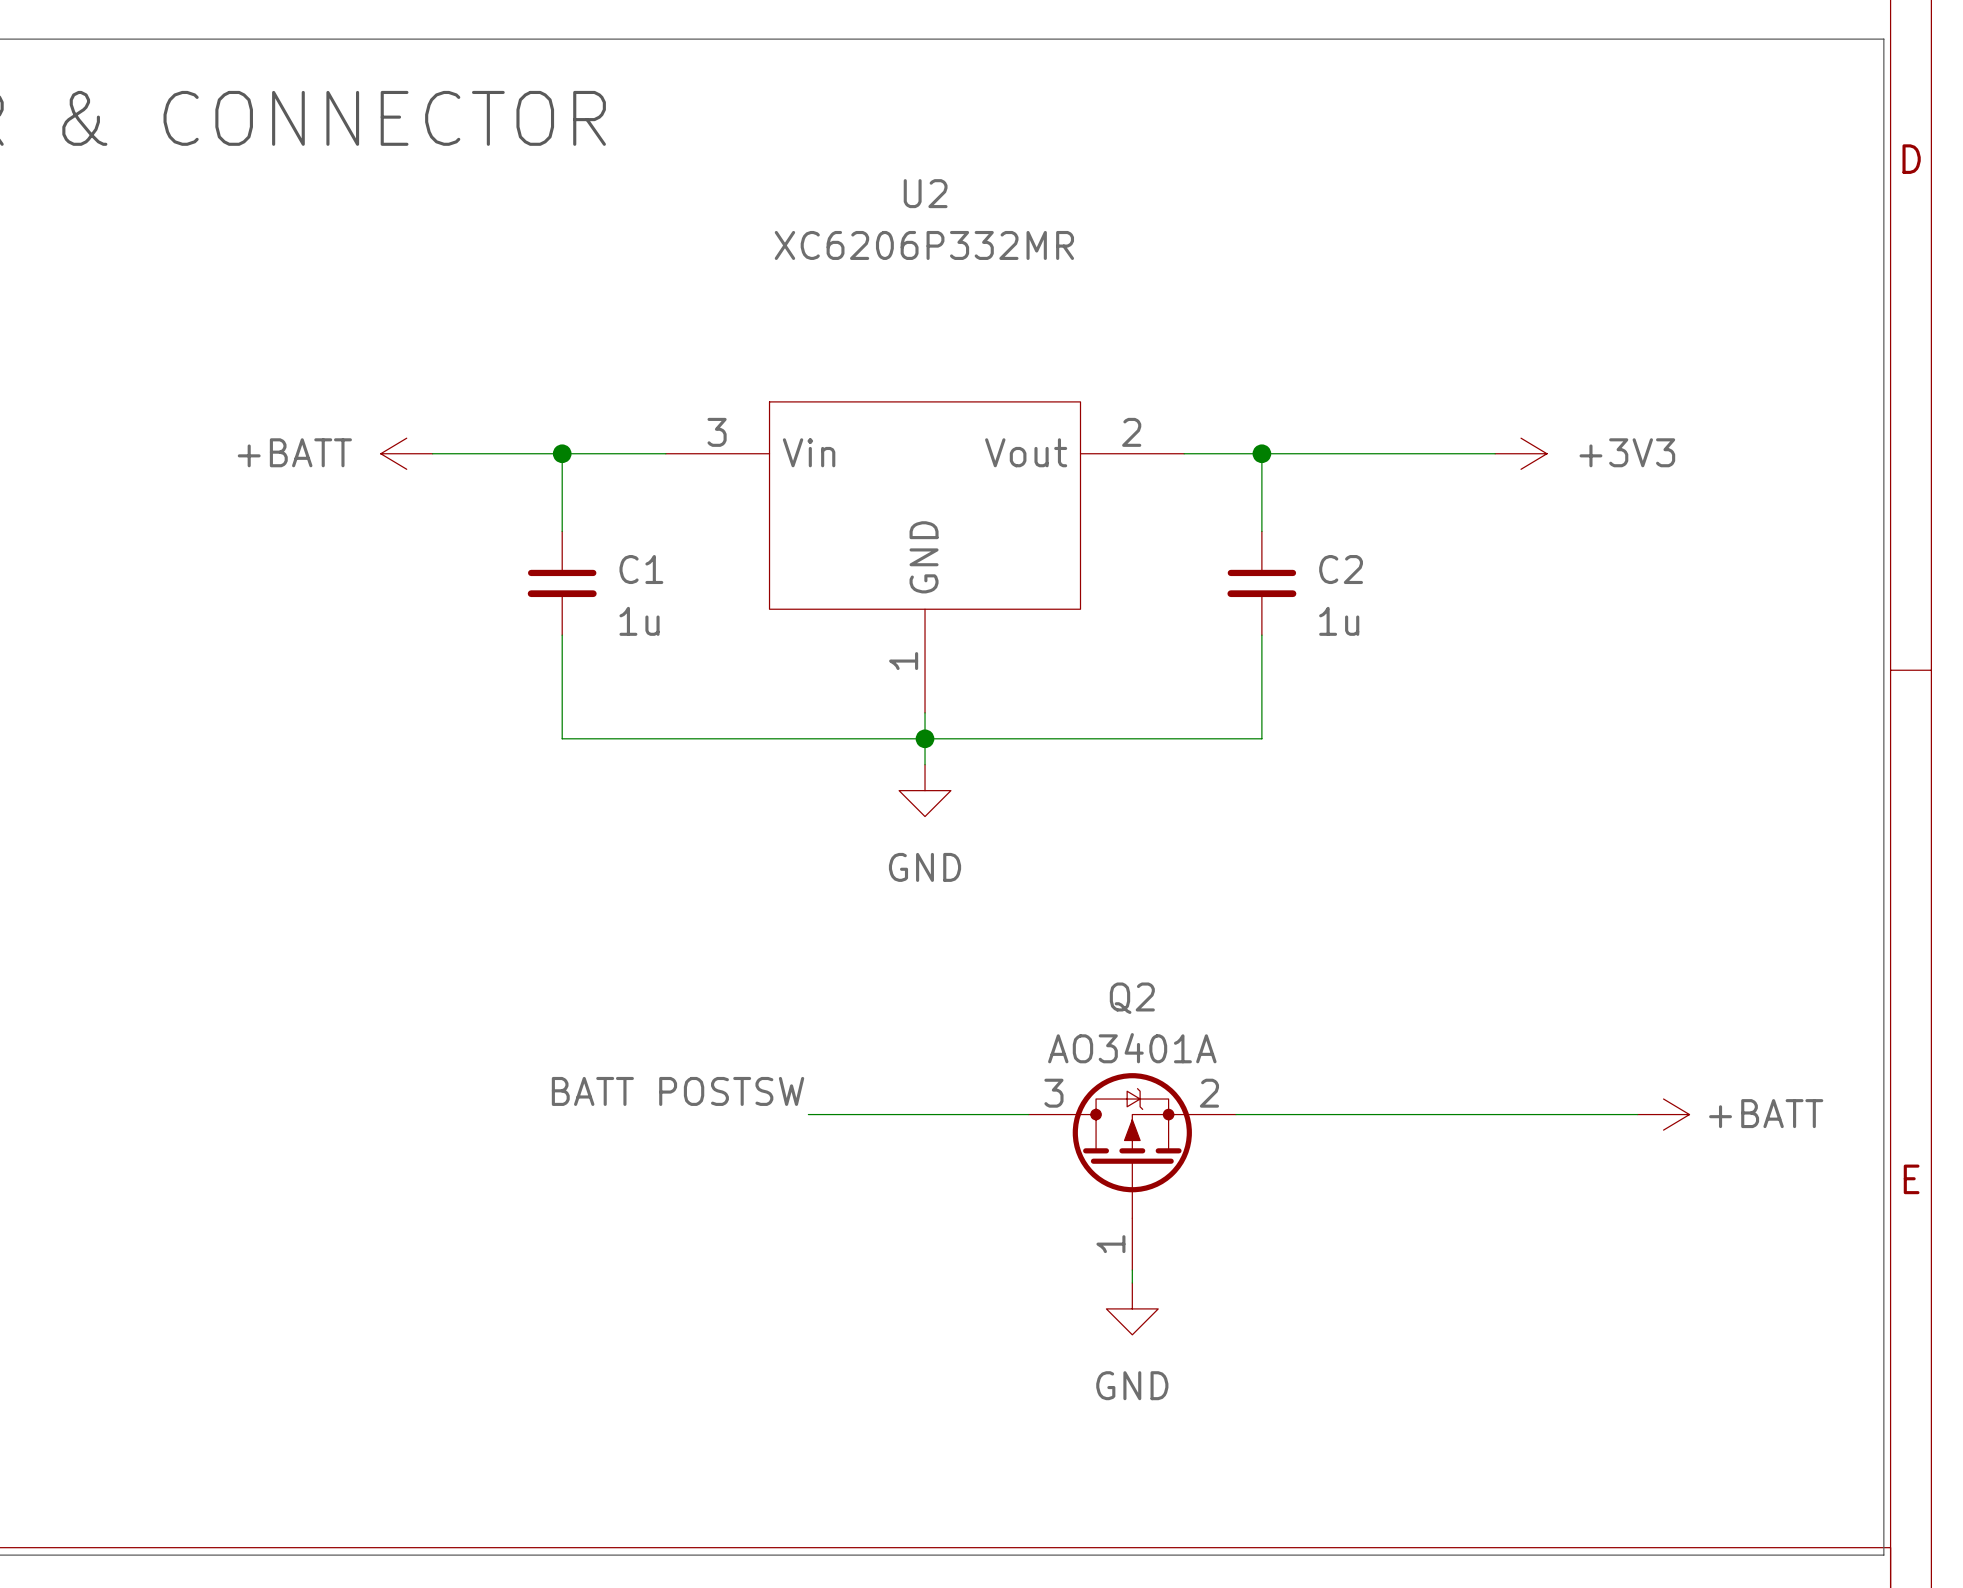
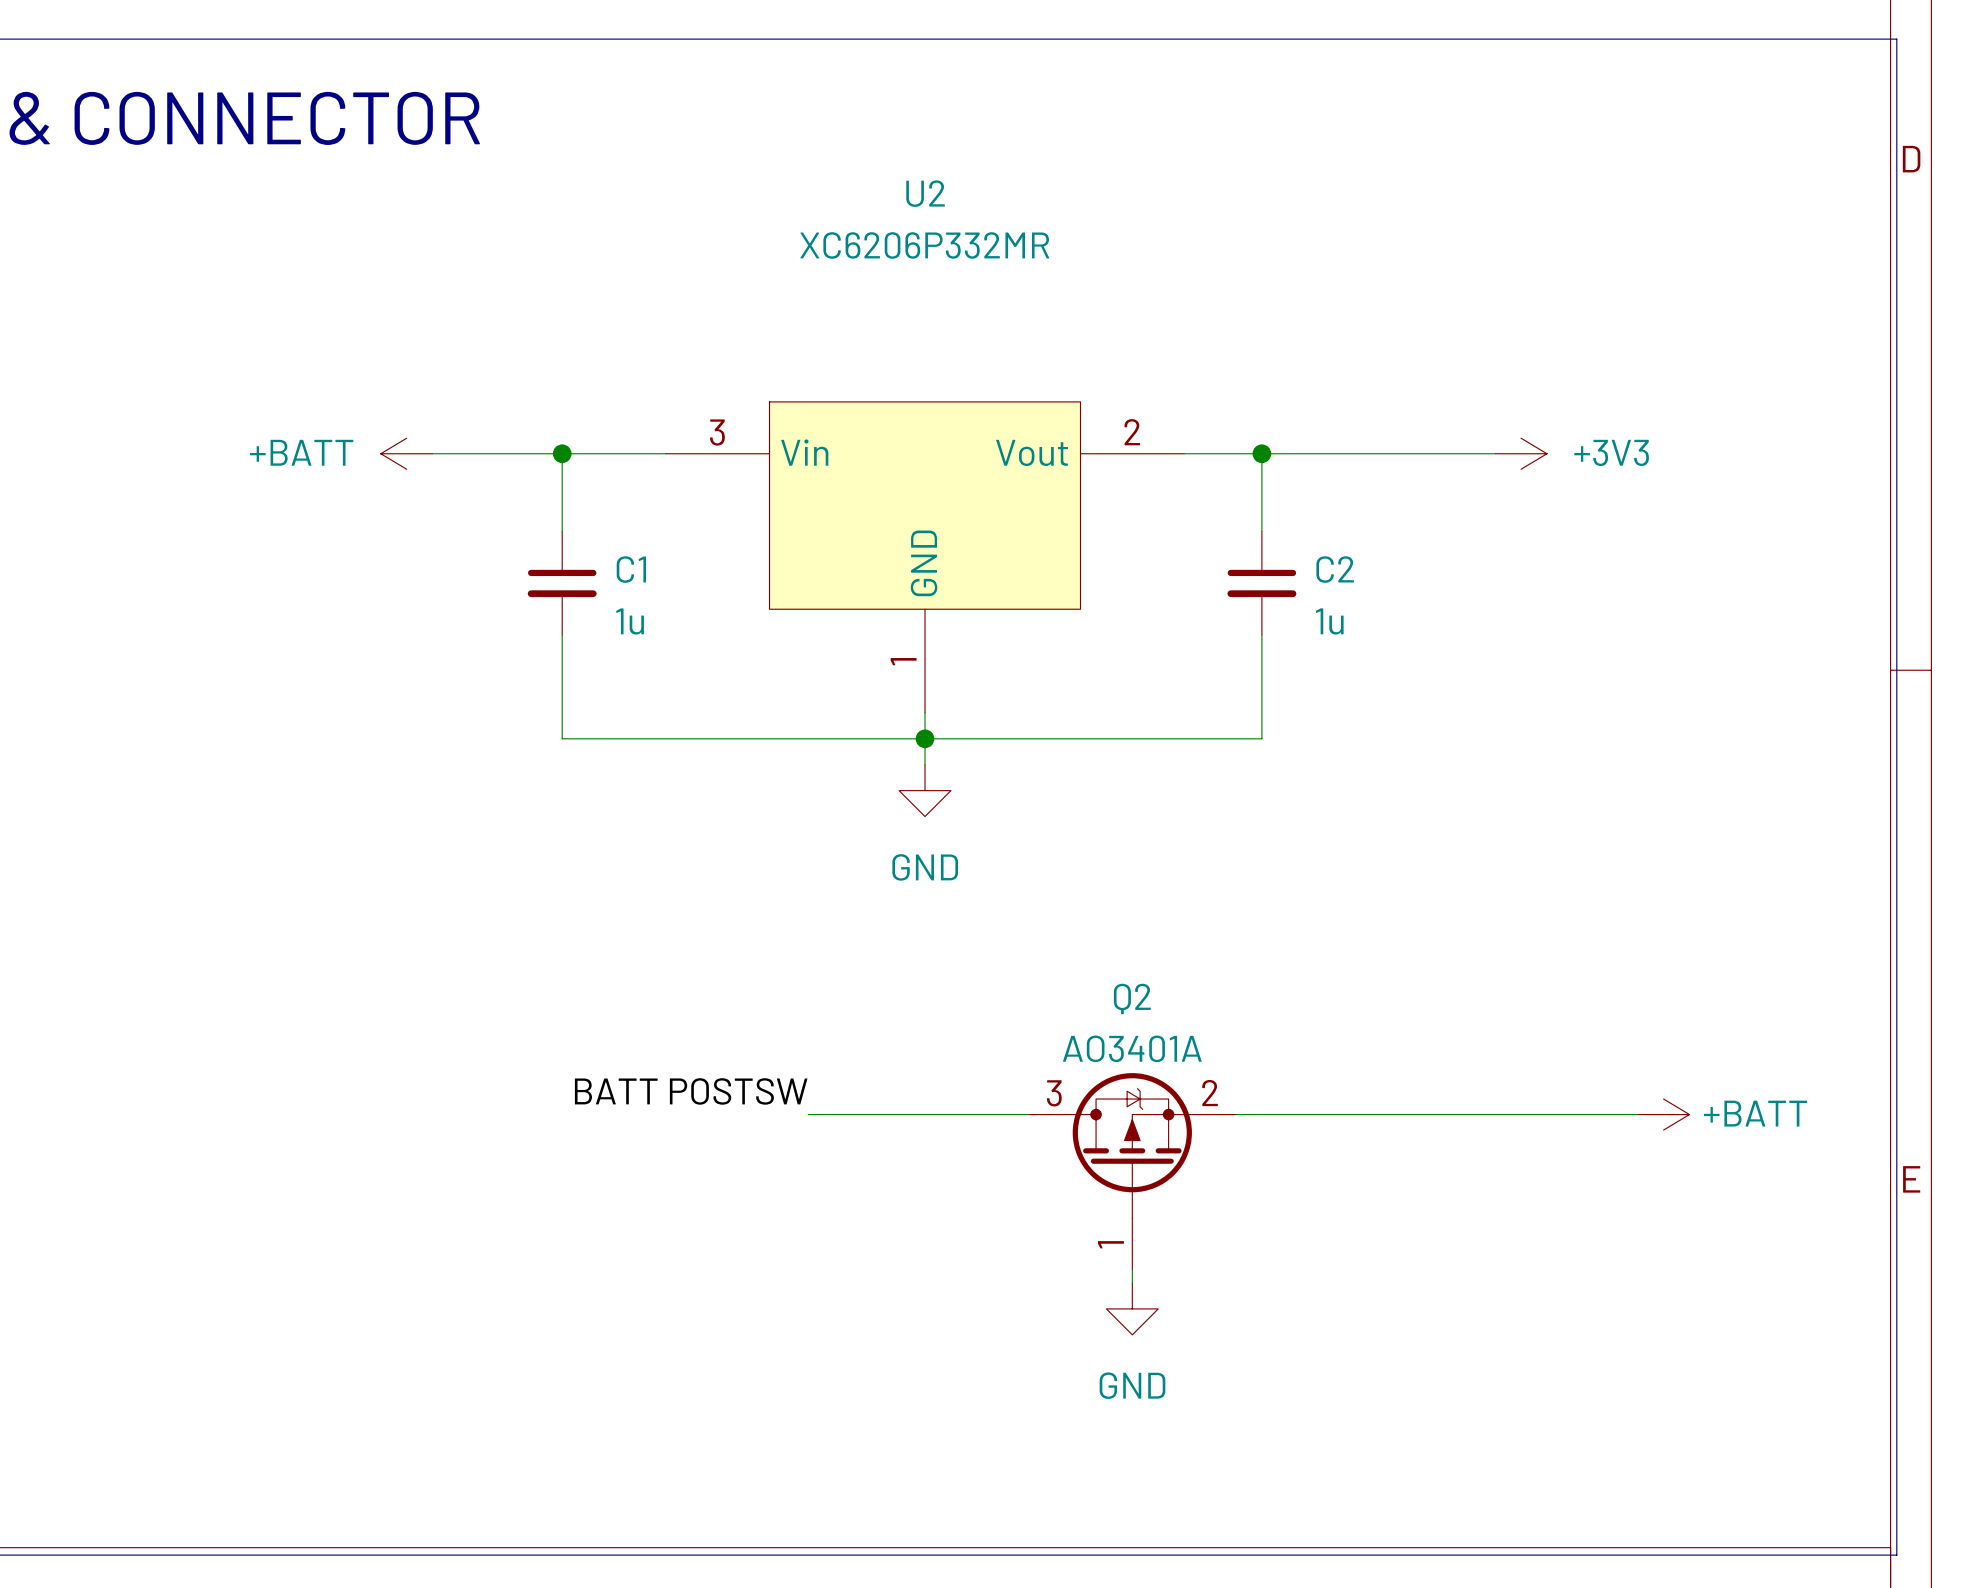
line: (1883, 39) (1883, 1555) -> (1883, 39) (1896, 39) (1896, 1555) (1883, 1555)

